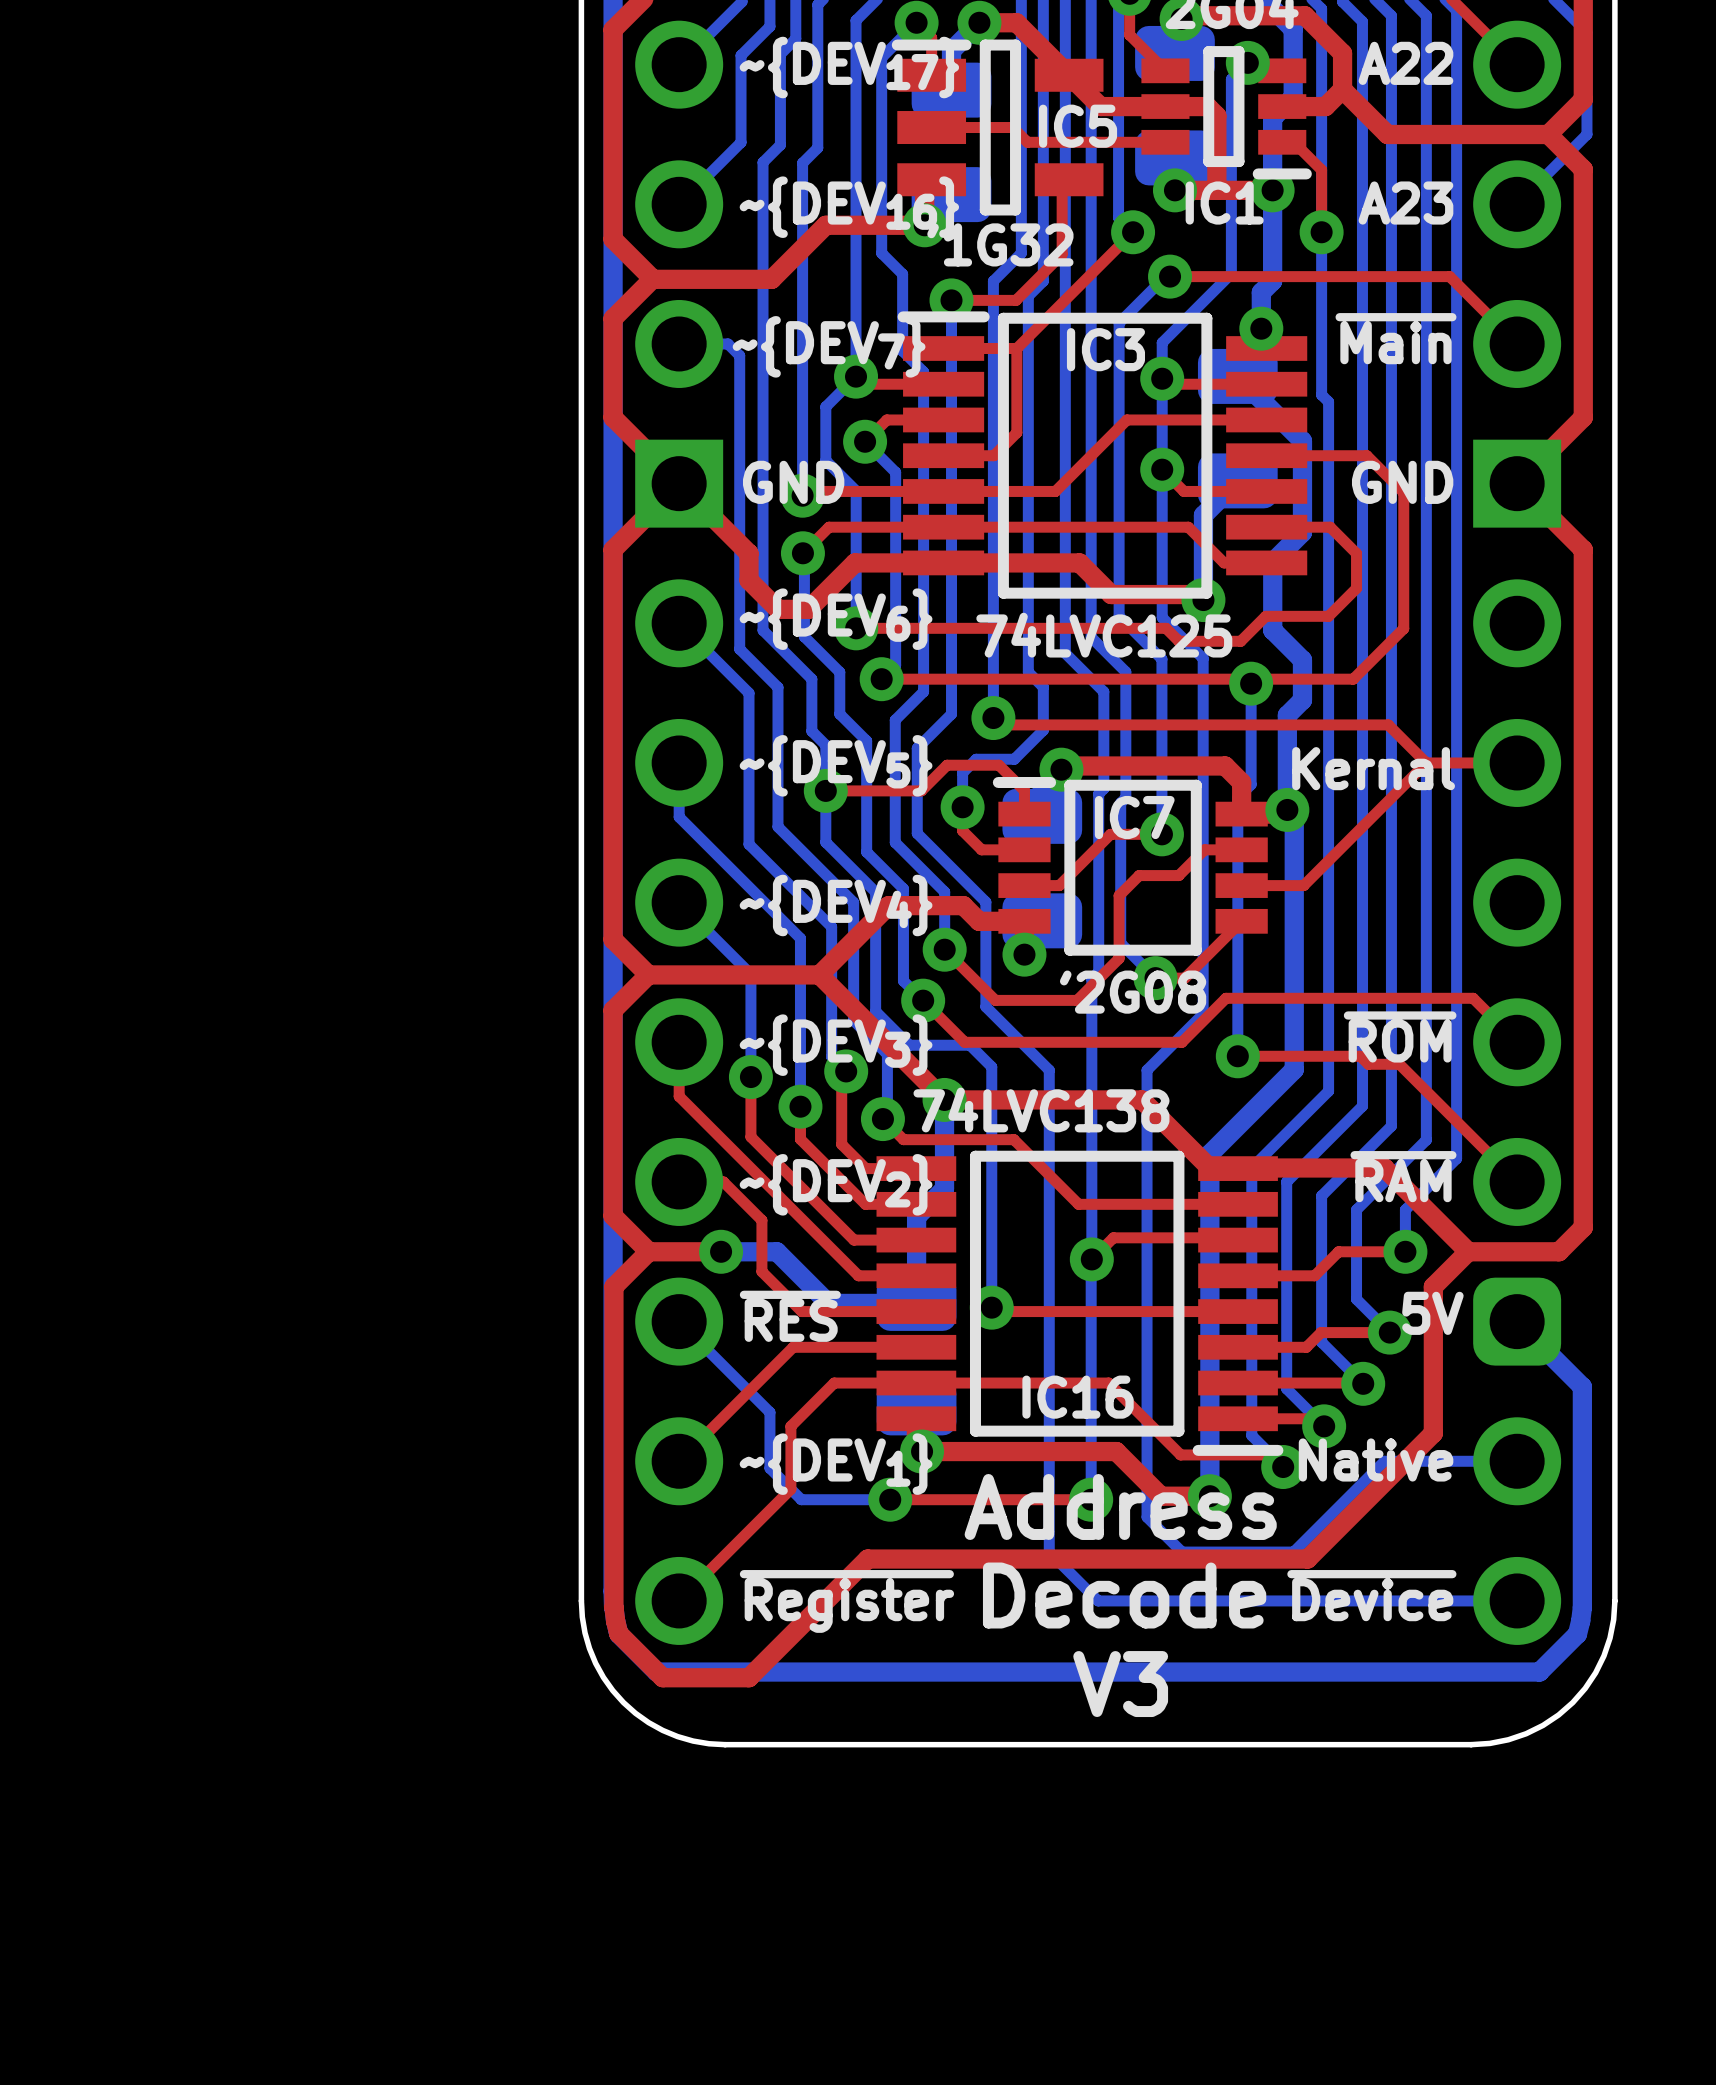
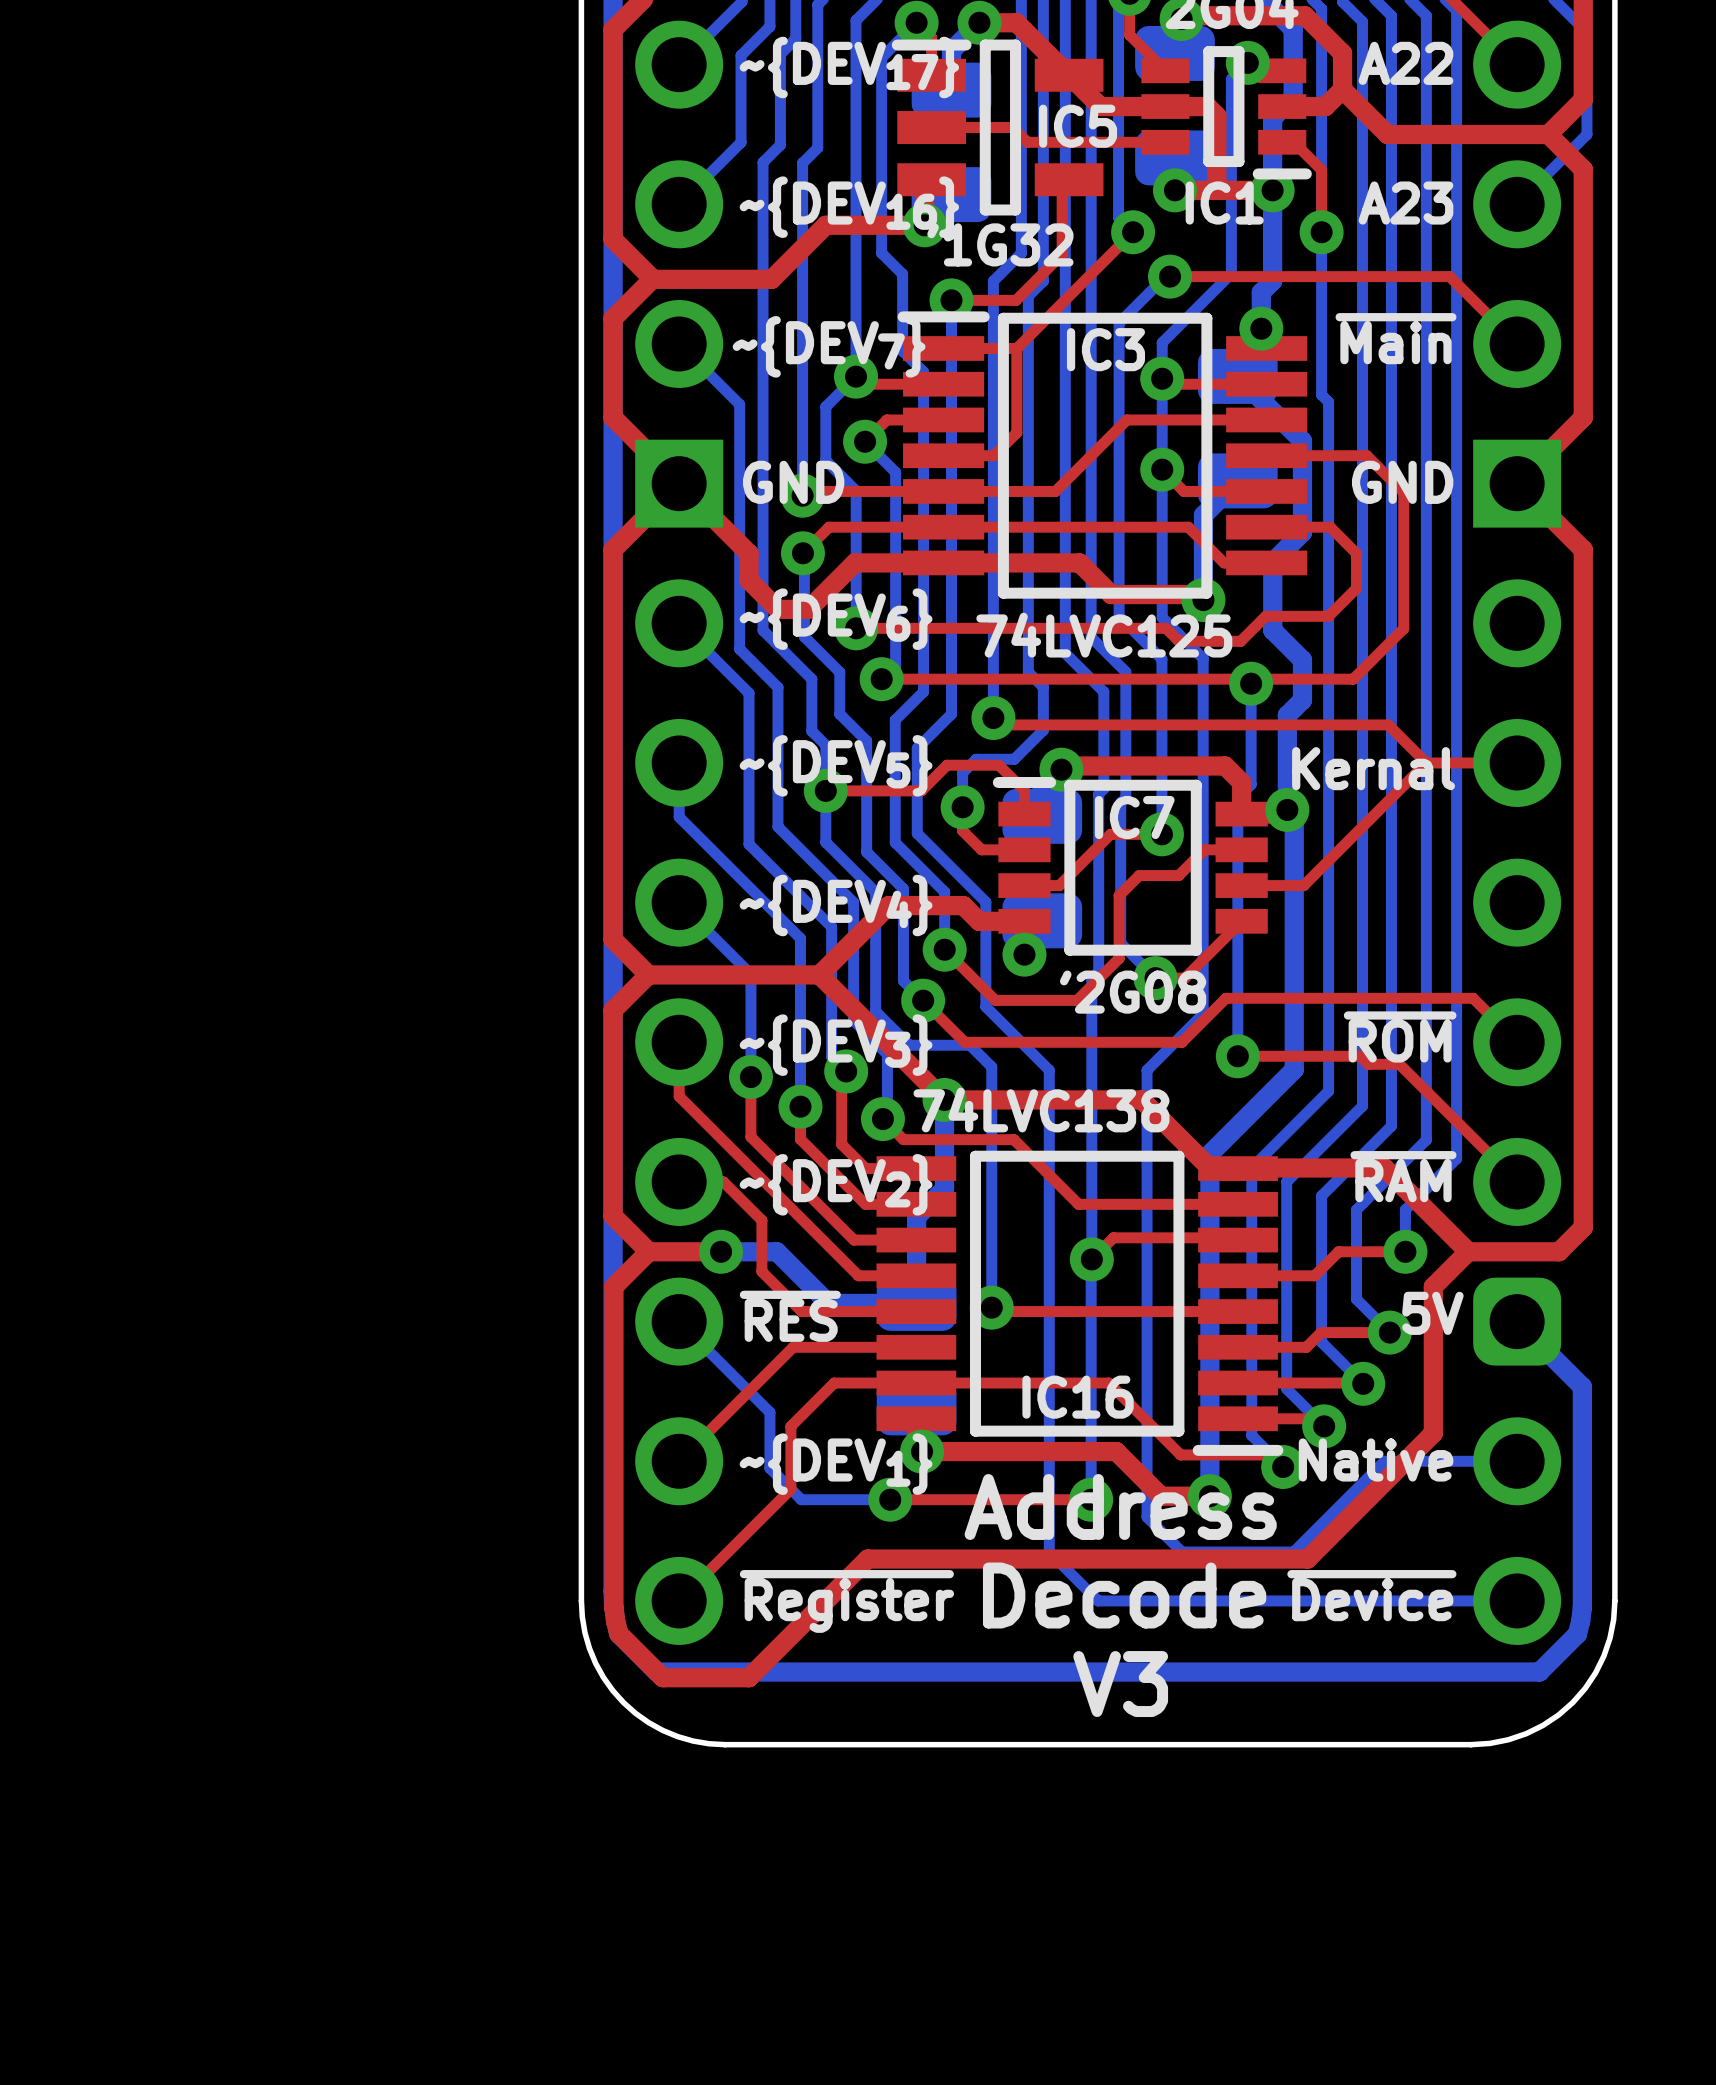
bottom track: (679, 343) (728, 343) (739, 355) (739, 404) -> (679, 343) (739, 404)

